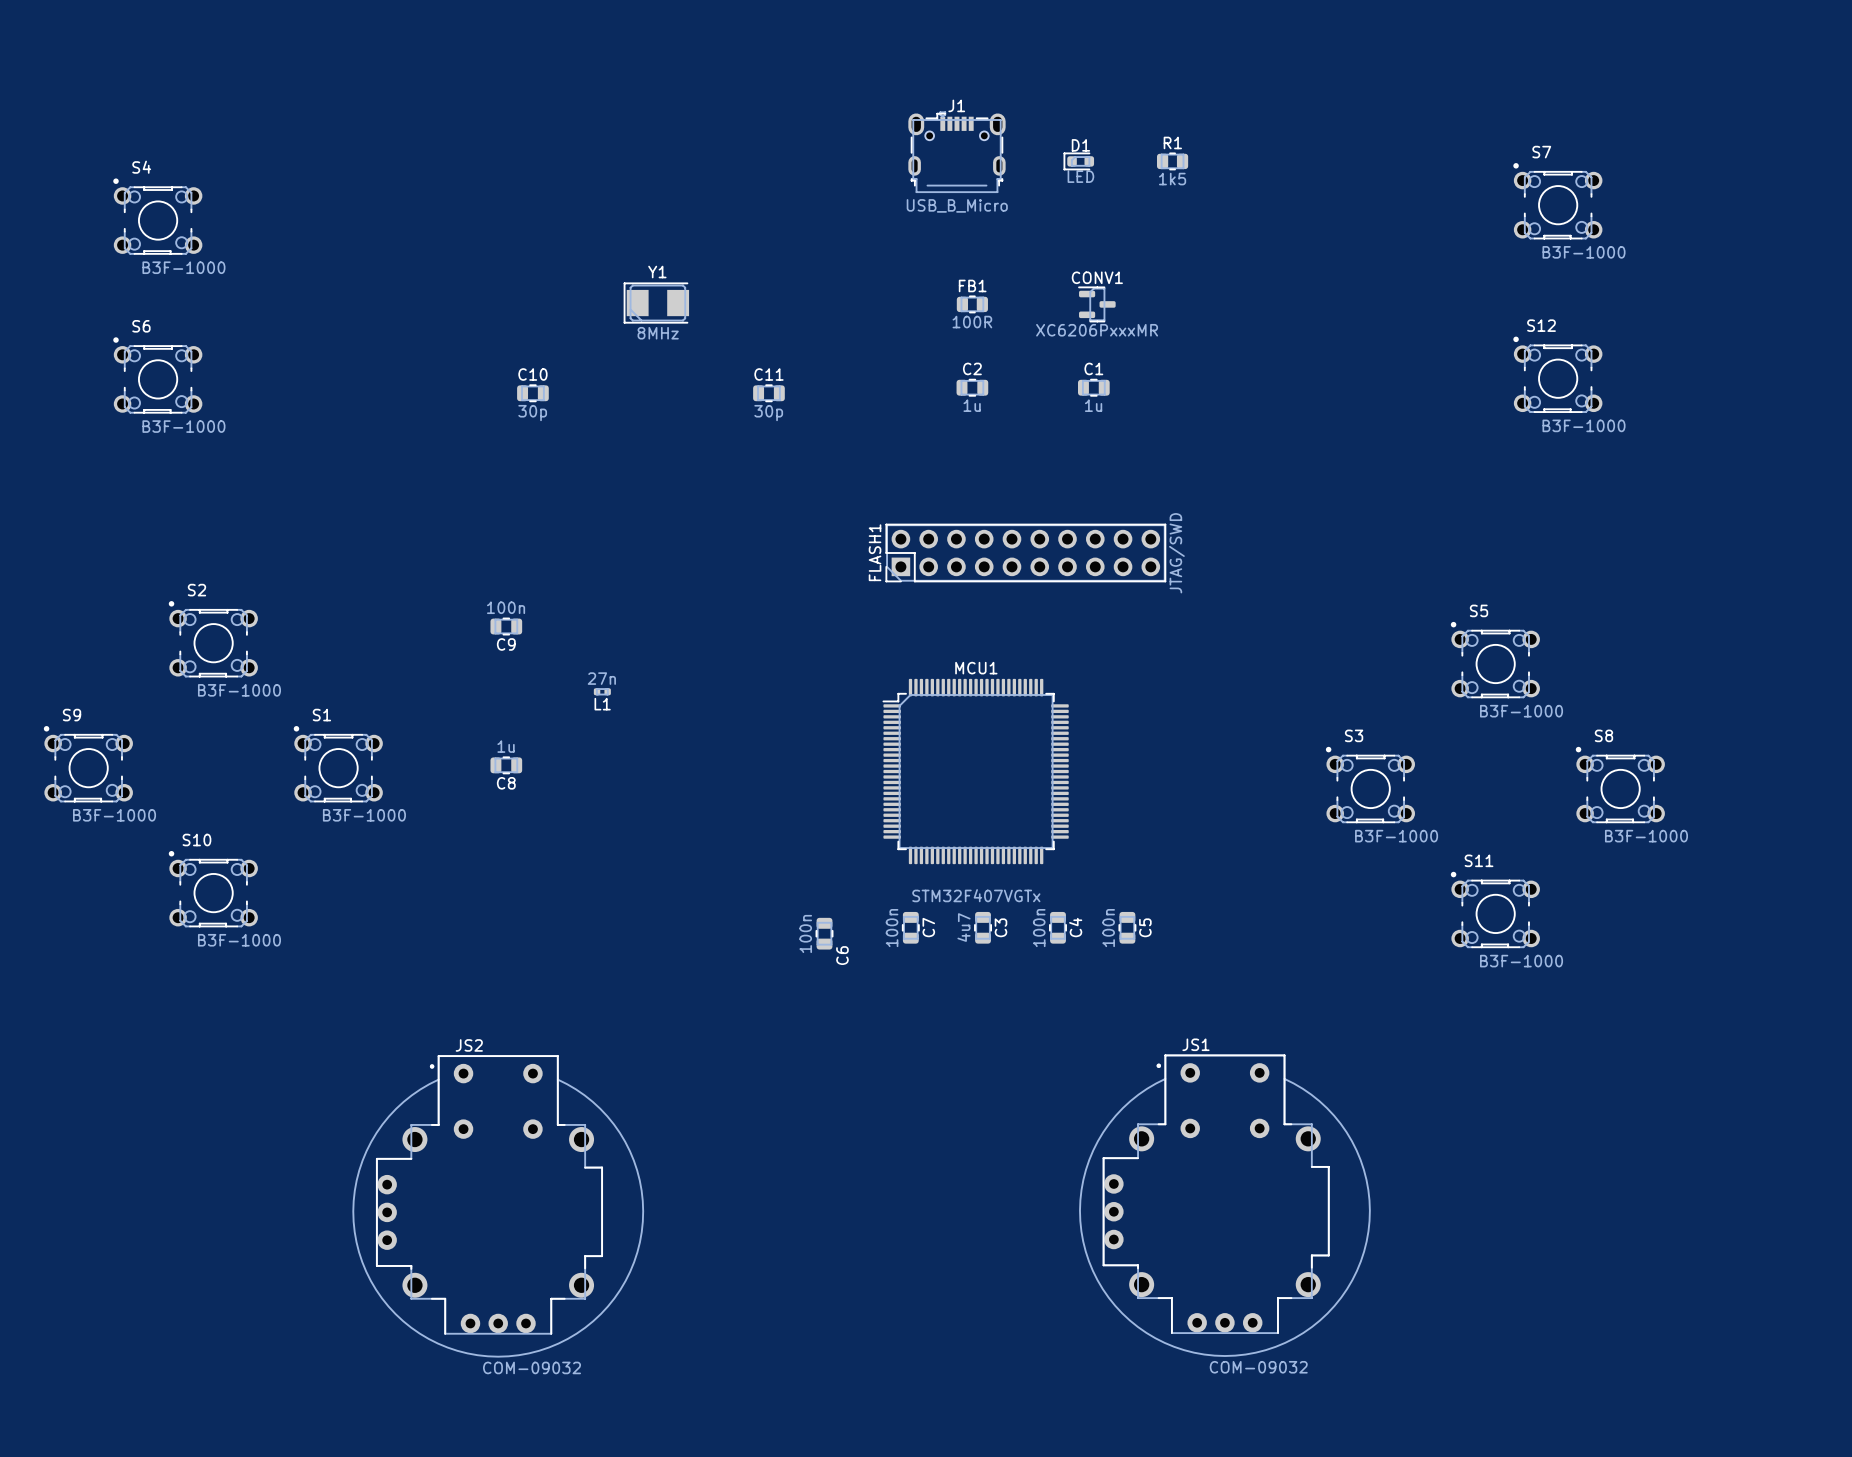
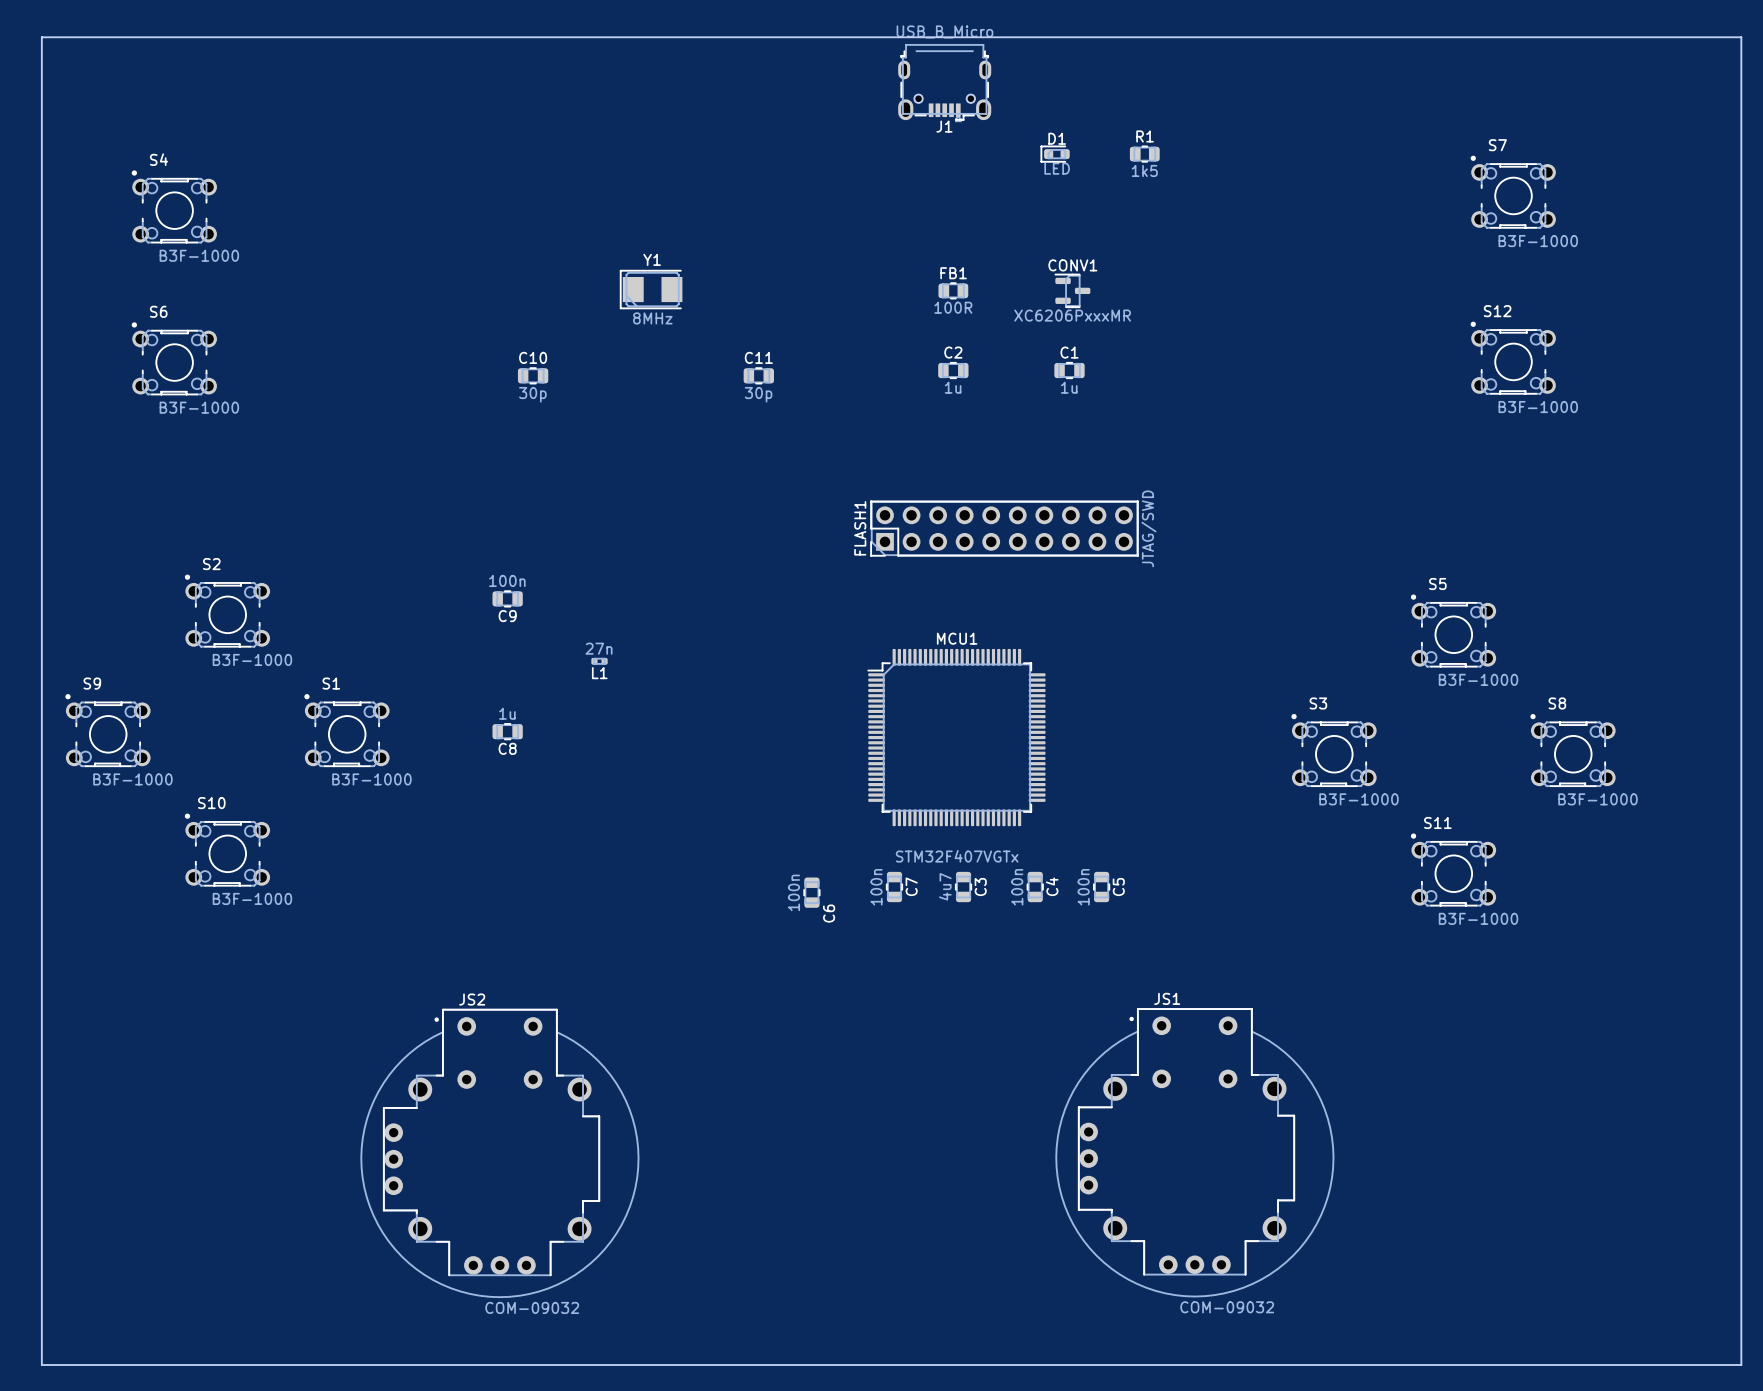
board edge: none -> (41, 37) (1741, 37) (1741, 1365) (41, 1365) (41, 37)
J1 rotation: 0° (956, 152) -> 180° (944, 83)
J1 position: (956, 152) -> (944, 83)

